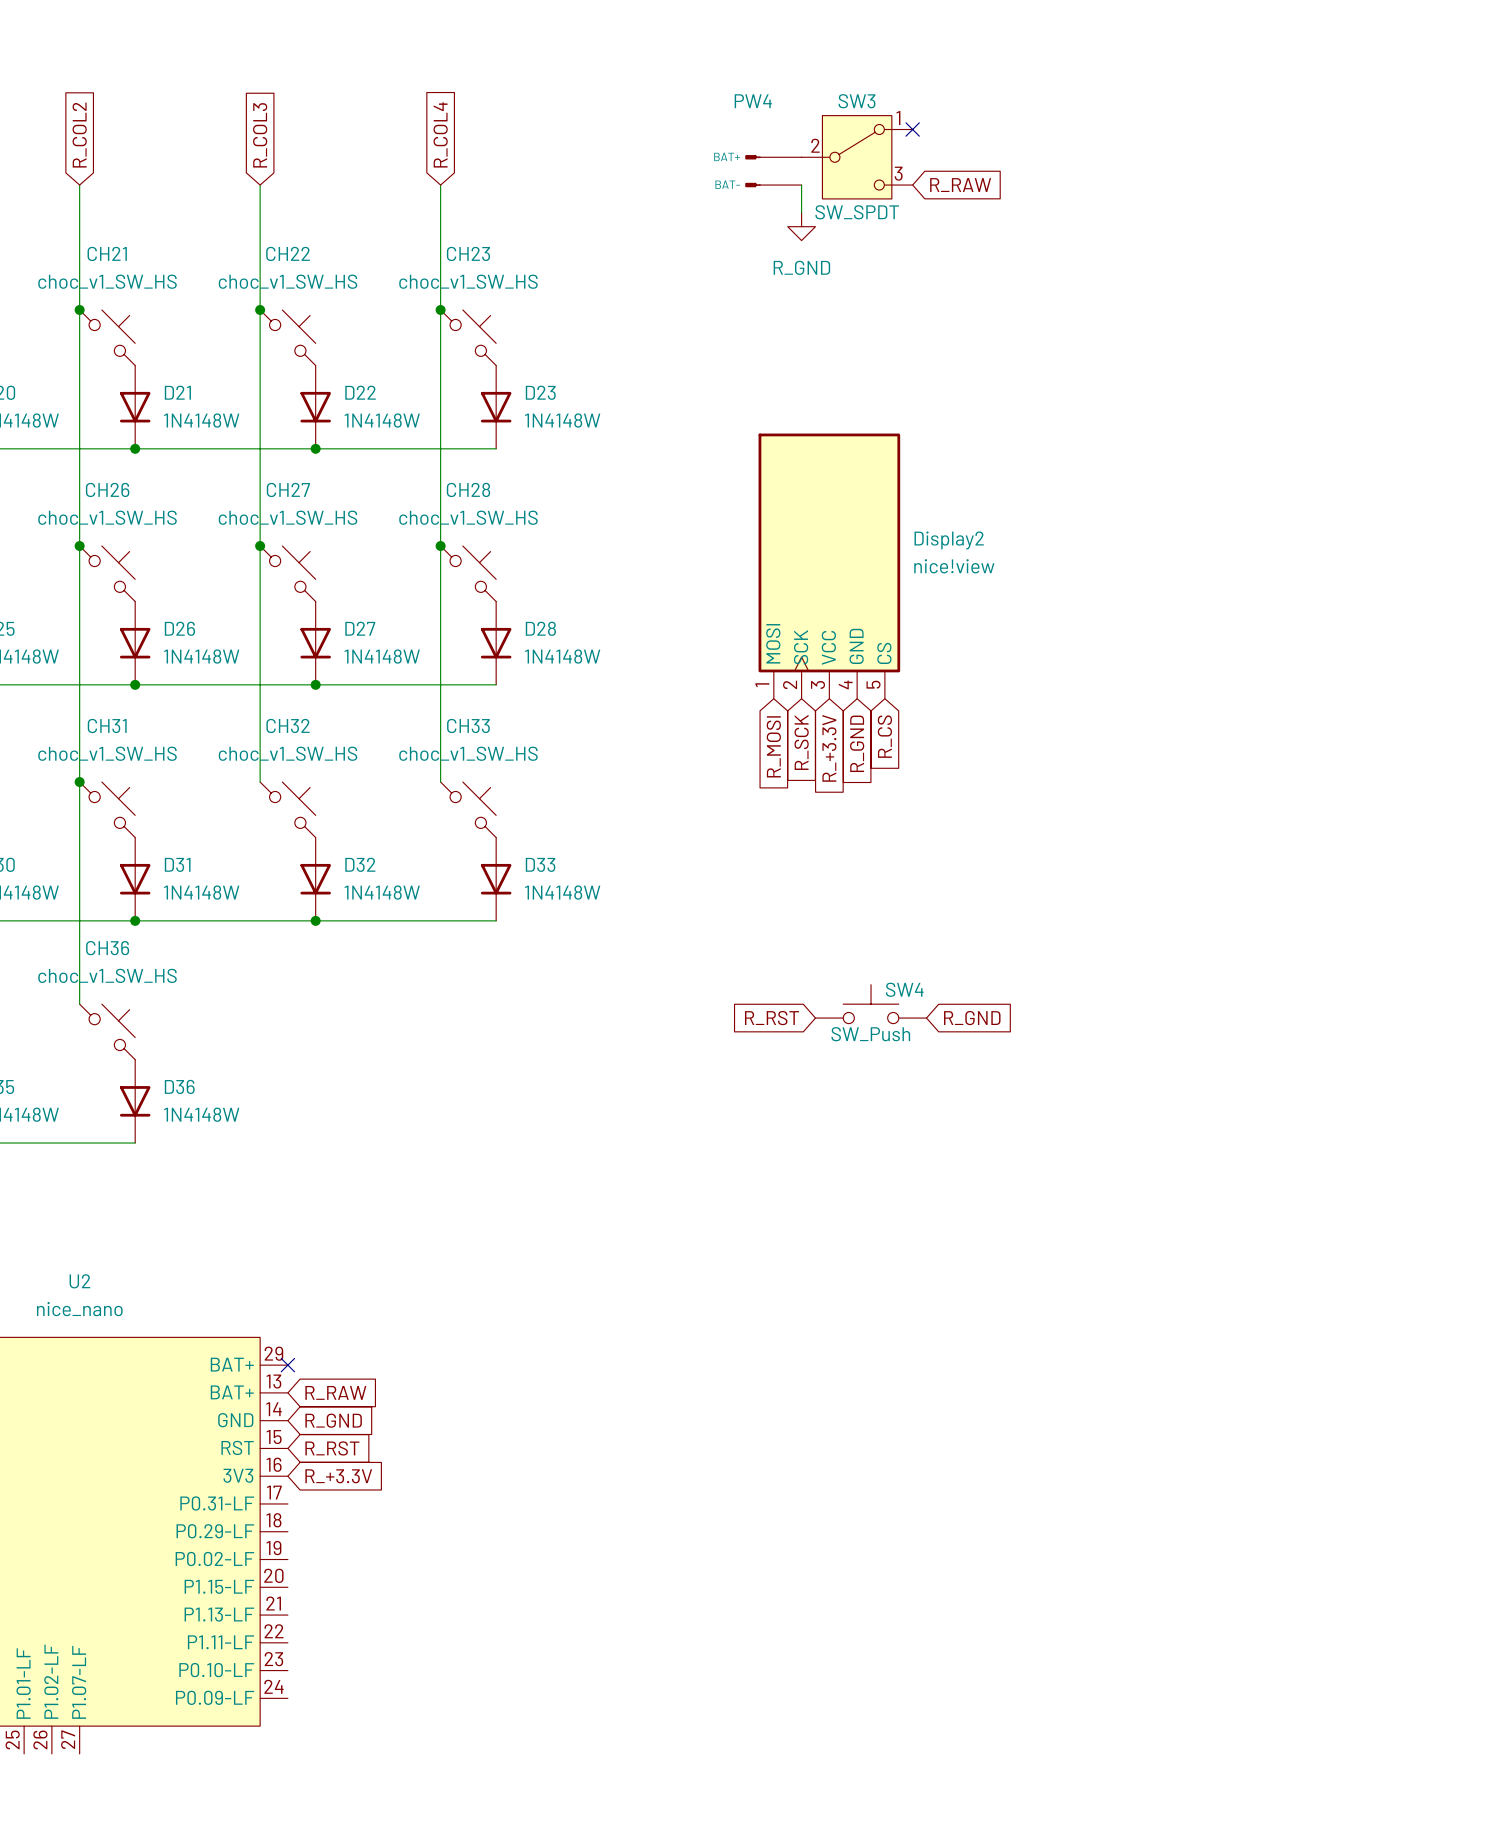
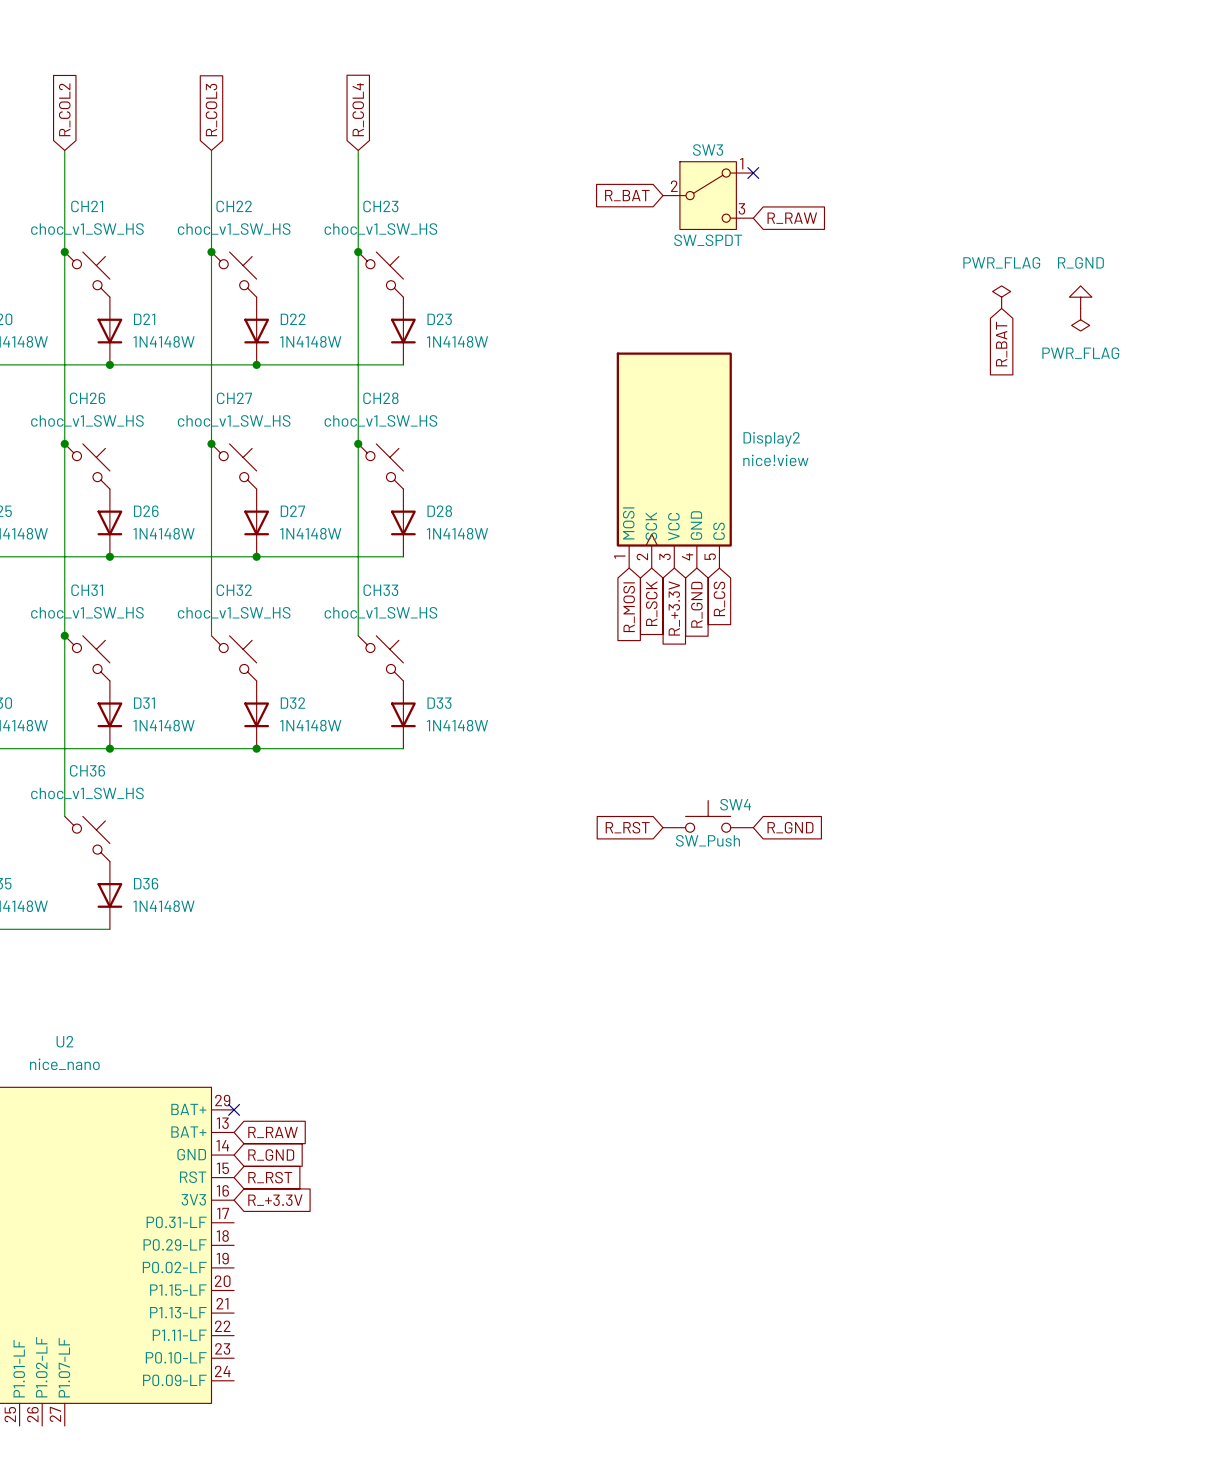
no-connect mark: (912, 129) -> none
SW3 position: (857, 157) -> (708, 195)
PW4: (773, 171) -> none
wire: (801, 185) (801, 212) -> none
global label position: R_RAW (960, 185) -> R_RAW (792, 218)
no-connect mark: none -> (753, 173)
power symbol: R_GND (801, 226) -> none
global label: none -> R_BAT (627, 195)
power symbol: none -> PWR_FLAG (1001, 297)
power symbol: none -> R_GND (1080, 297)
power symbol: none -> PWR_FLAG (1080, 319)
global label: none -> R_BAT (1001, 344)

